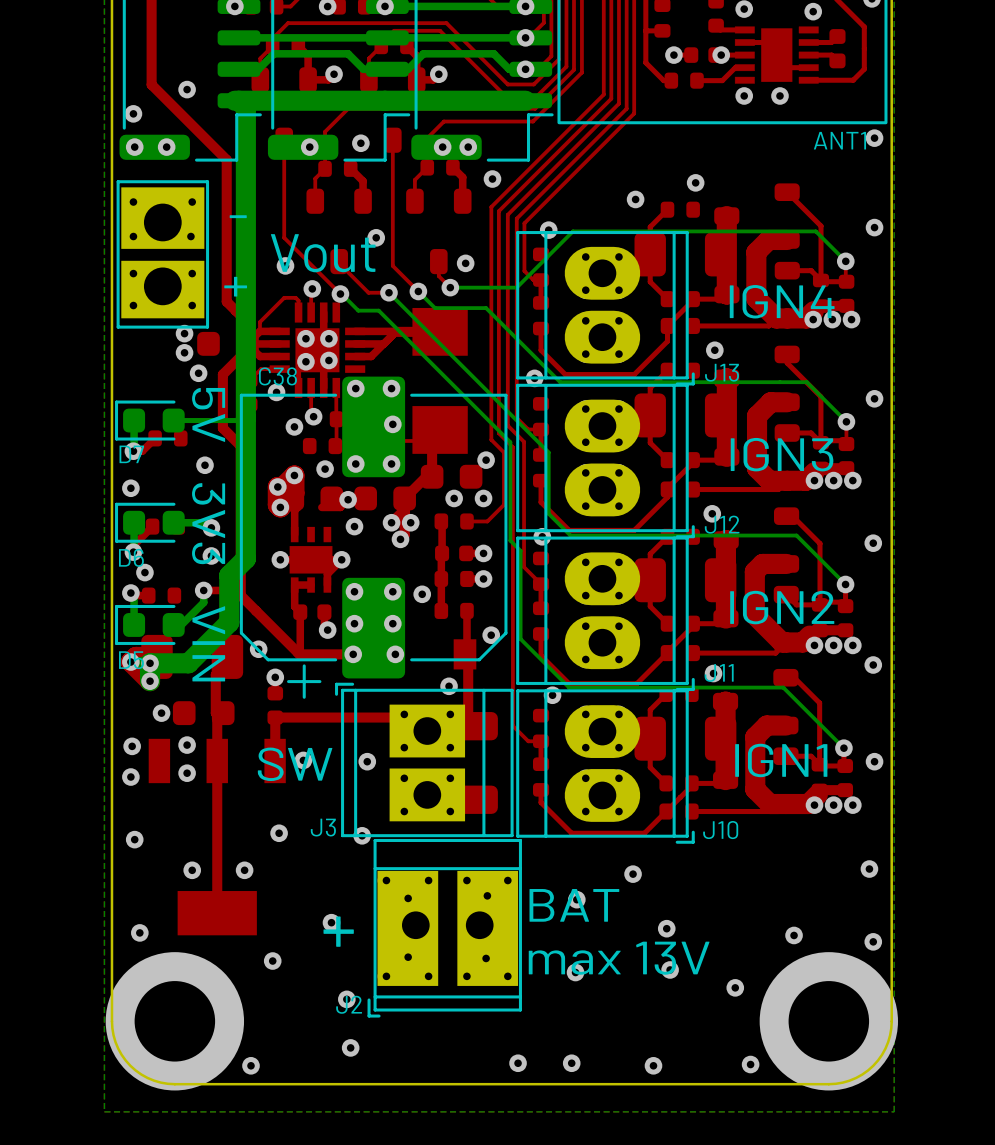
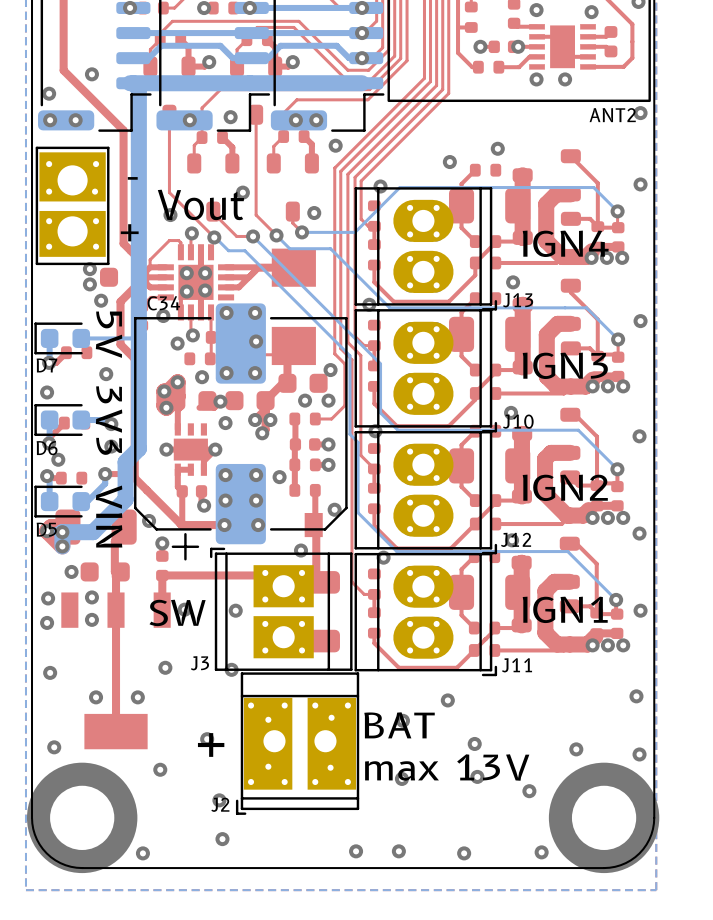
ANT1 name: ANT1 (839, 140) -> ANT2 (612, 115)
C38 name: C38 (277, 376) -> C34 (163, 303)
J12 name: J12 (722, 524) -> J10 (518, 421)
J11 name: J11 (719, 672) -> J12 (516, 539)
J10 name: J10 (720, 830) -> J11 (517, 665)

